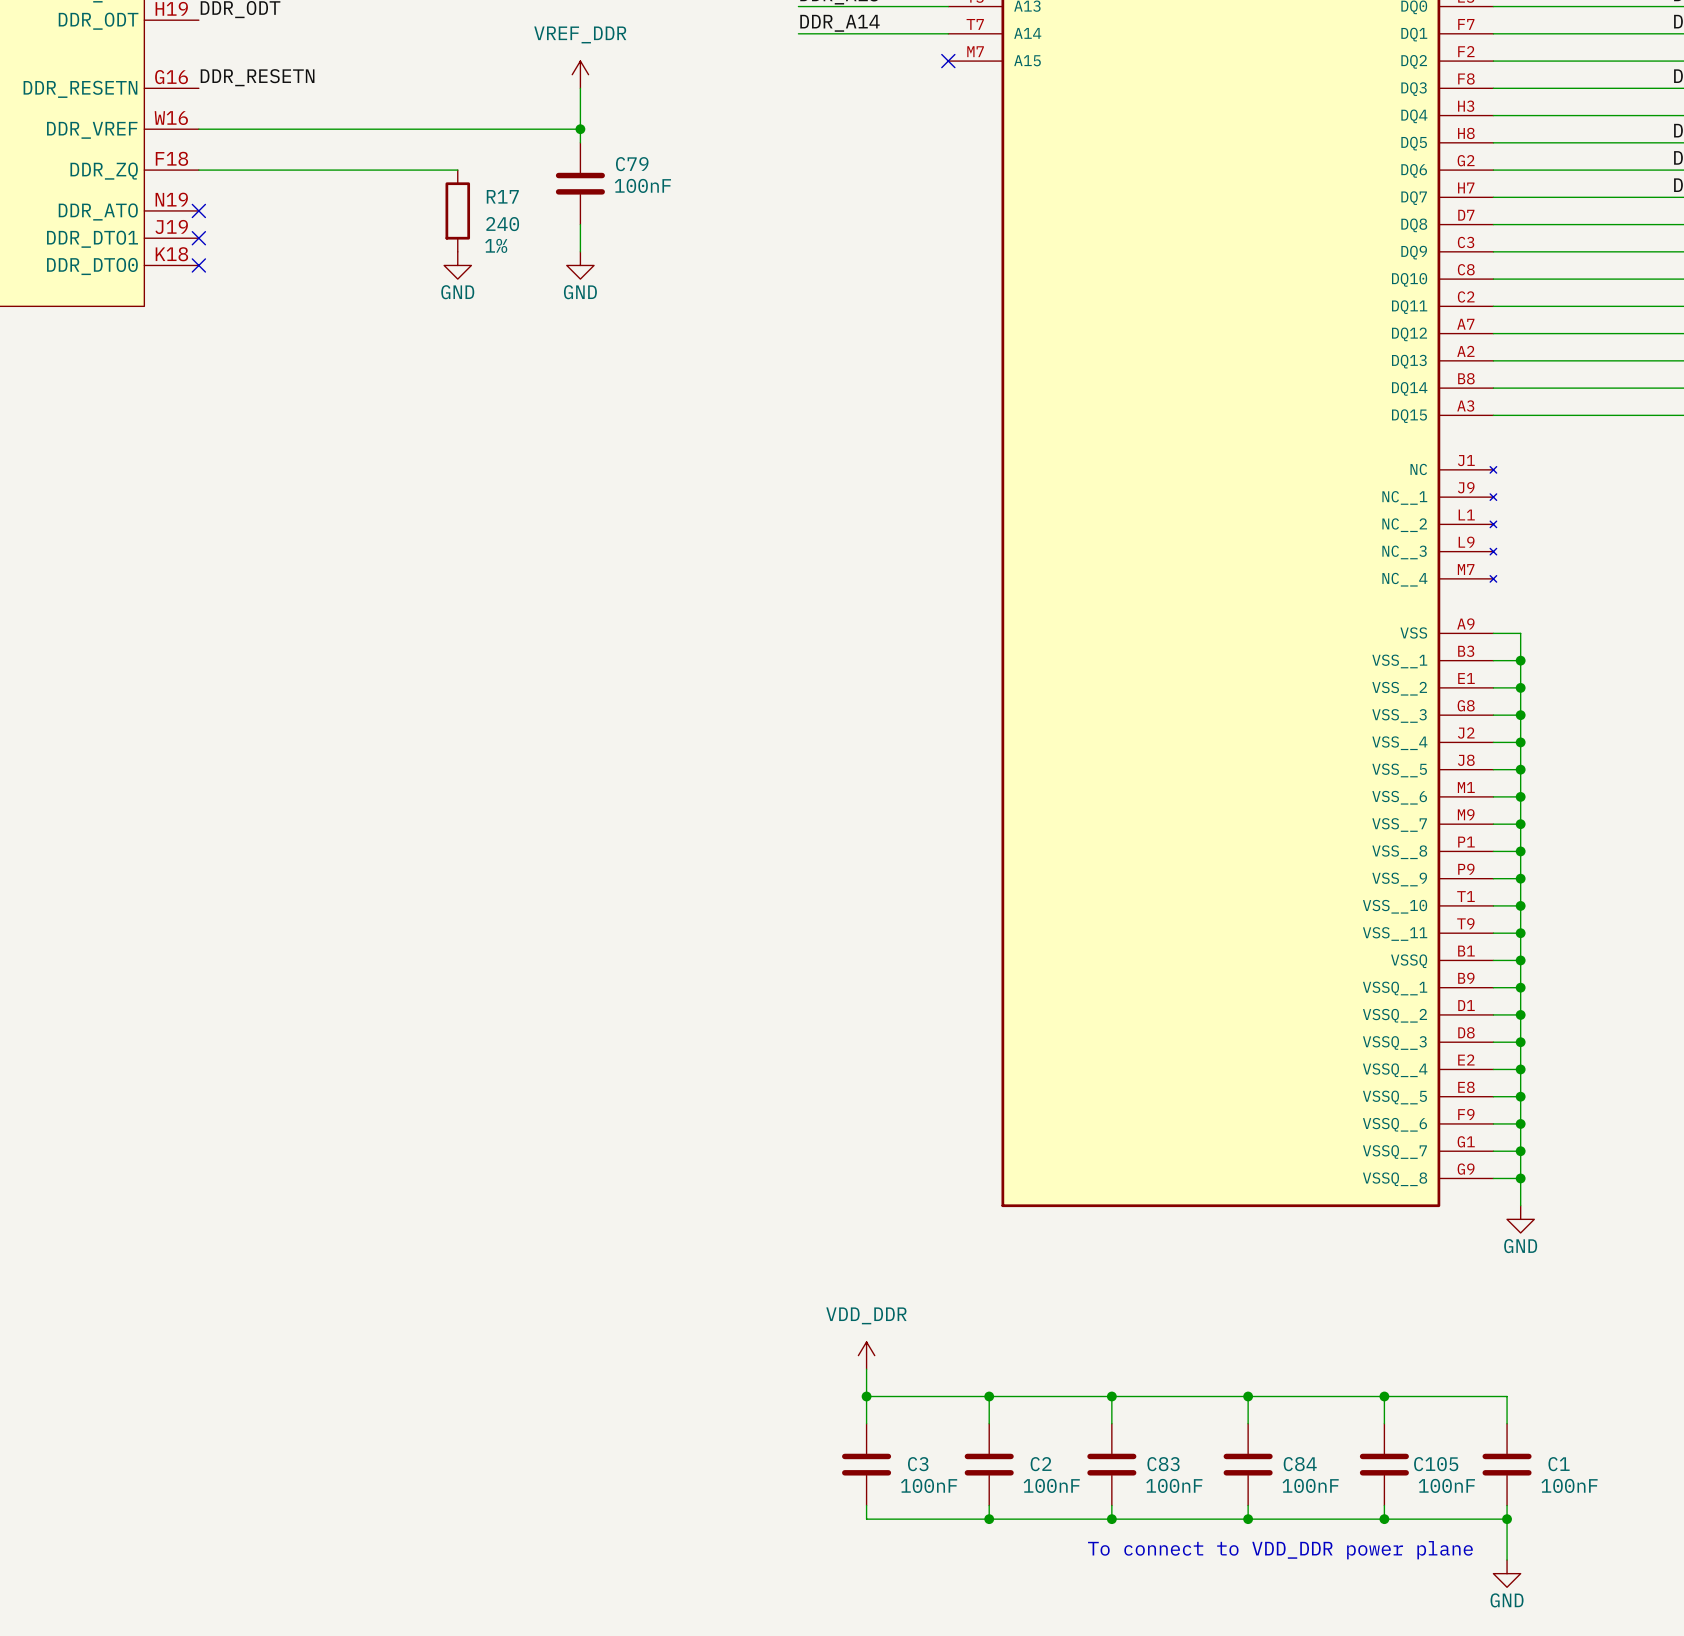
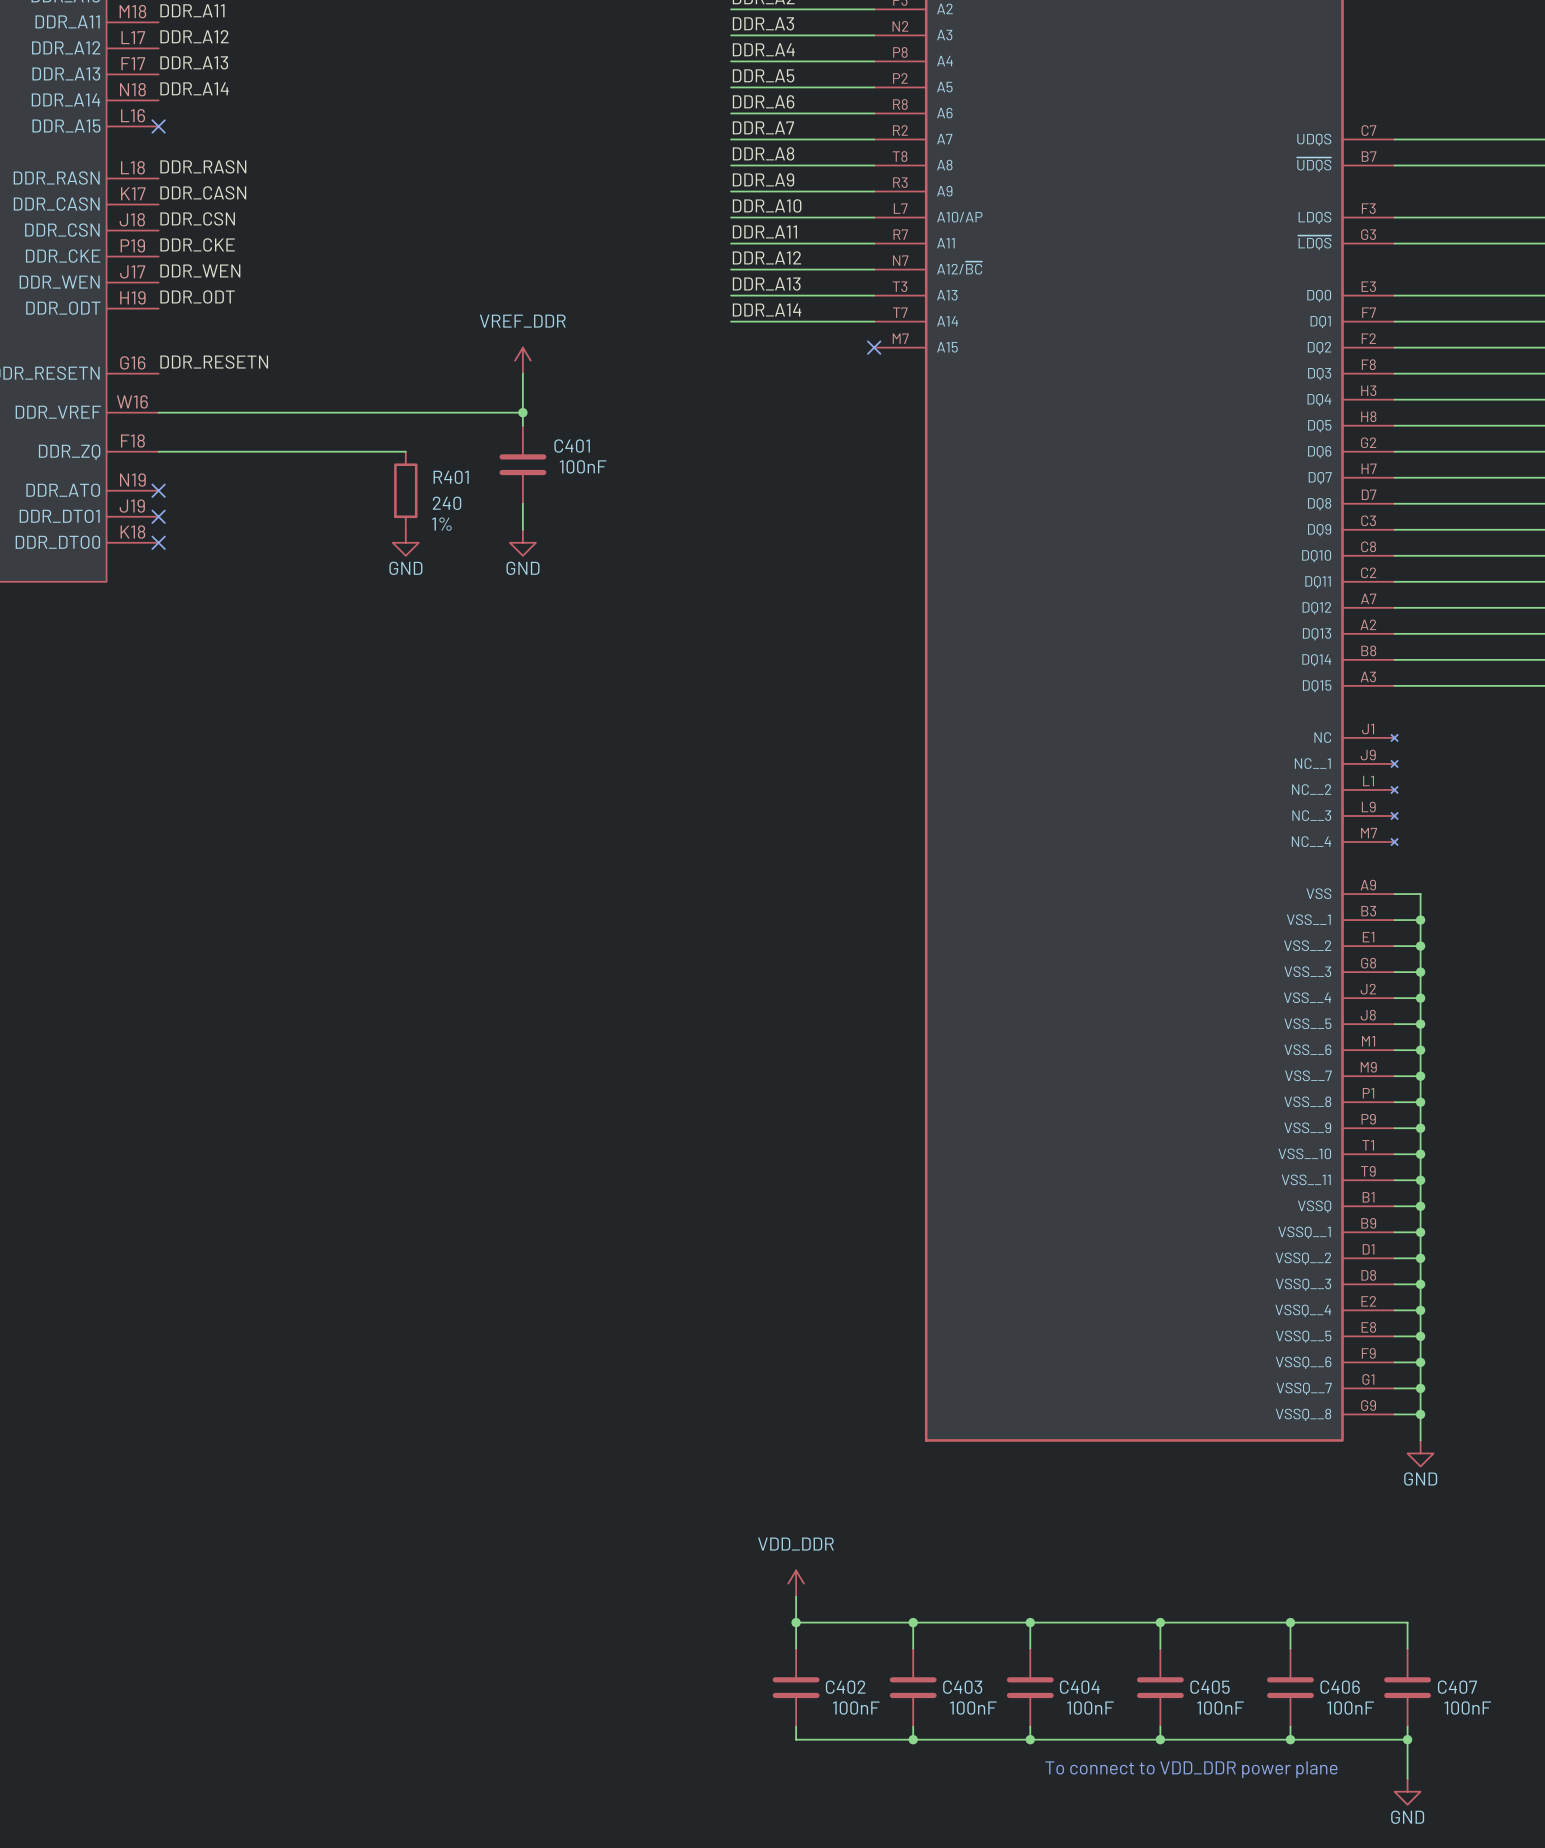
C79 name: C79 (632, 164) -> C401 (572, 446)
R17 name: R17 (502, 196) -> R401 (451, 477)
C3 name: C3 (918, 1464) -> C402 (845, 1687)
C2 name: C2 (1041, 1464) -> C403 (962, 1687)
C83 name: C83 (1163, 1464) -> C404 (1079, 1687)
C84 name: C84 (1300, 1464) -> C405 (1210, 1687)
C105 name: C105 (1436, 1464) -> C406 (1340, 1687)
C1 name: C1 (1559, 1464) -> C407 (1457, 1687)

